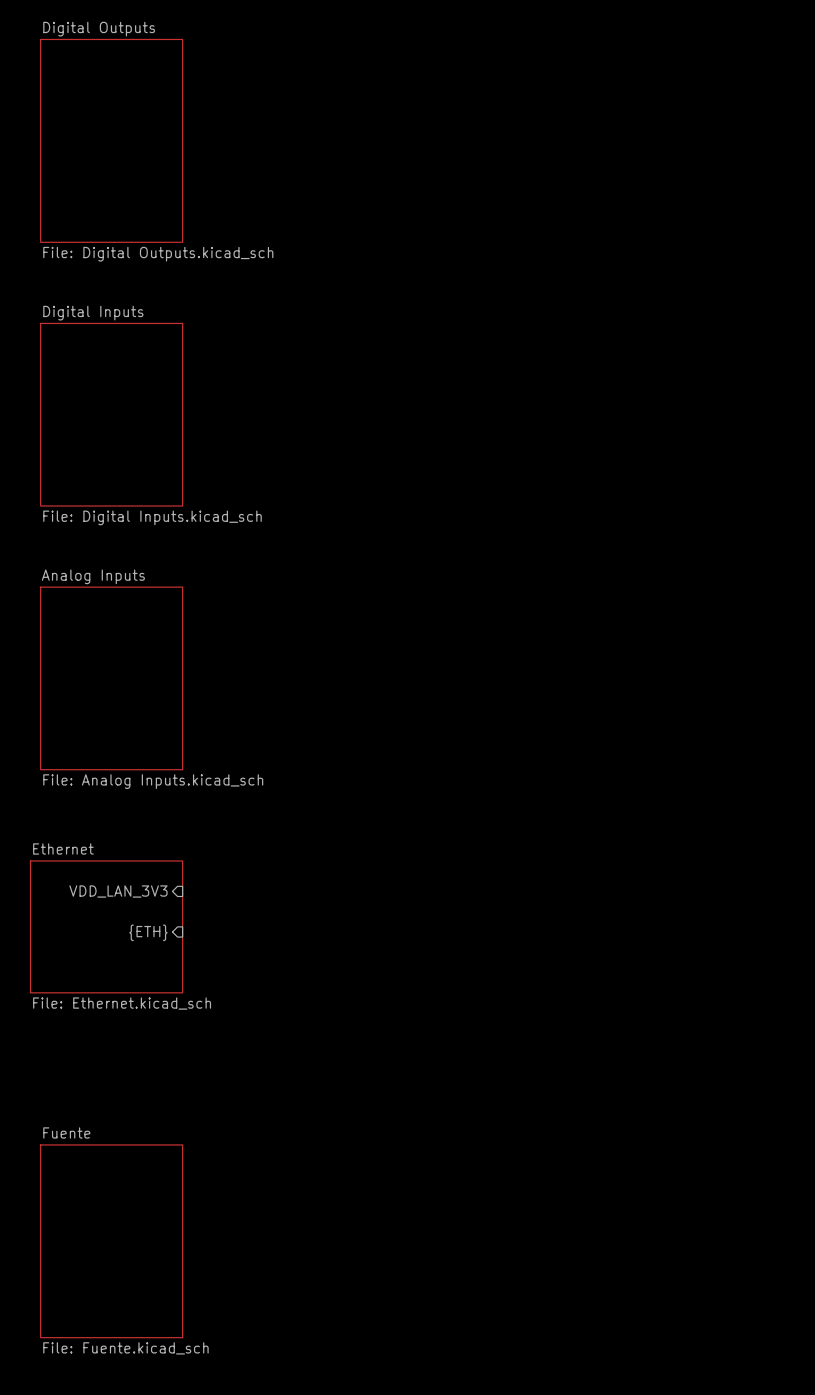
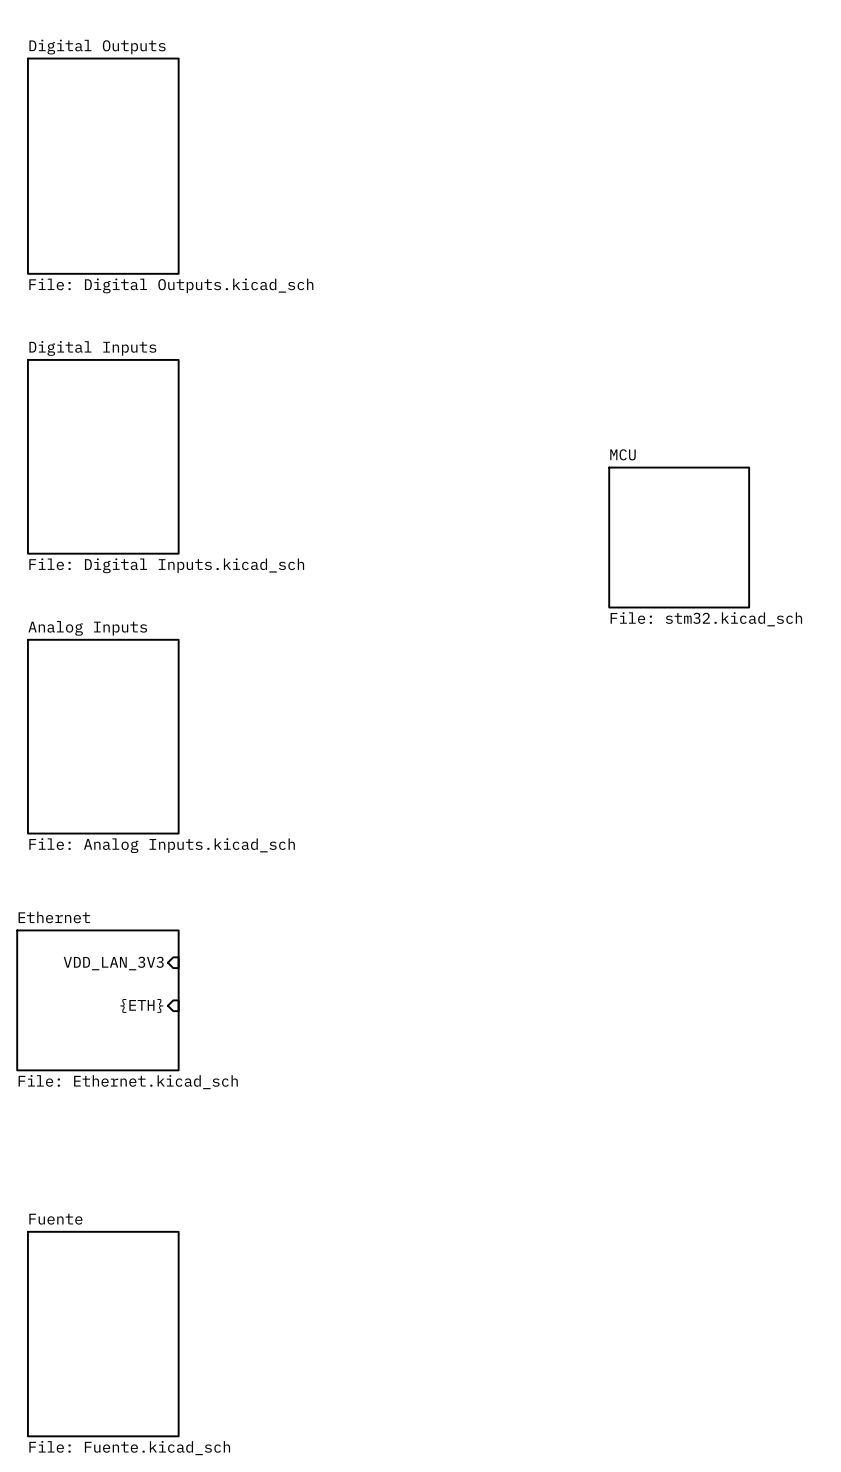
sheet MCU: none -> File: stm32.kicad_sch (679, 537)

